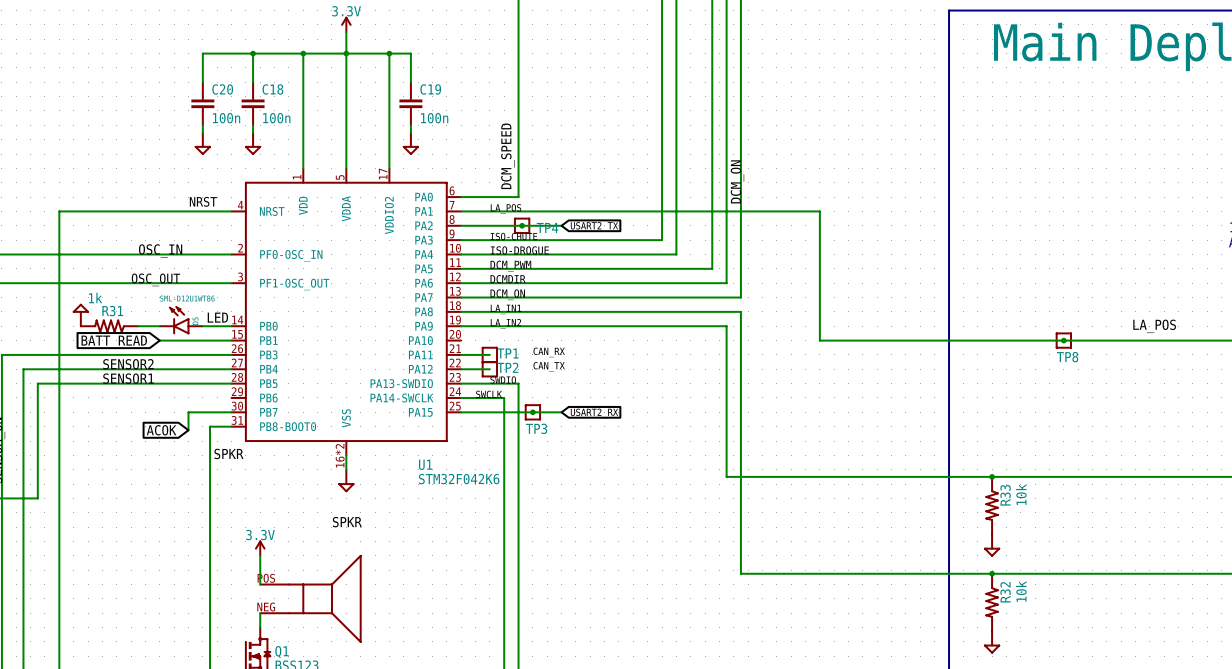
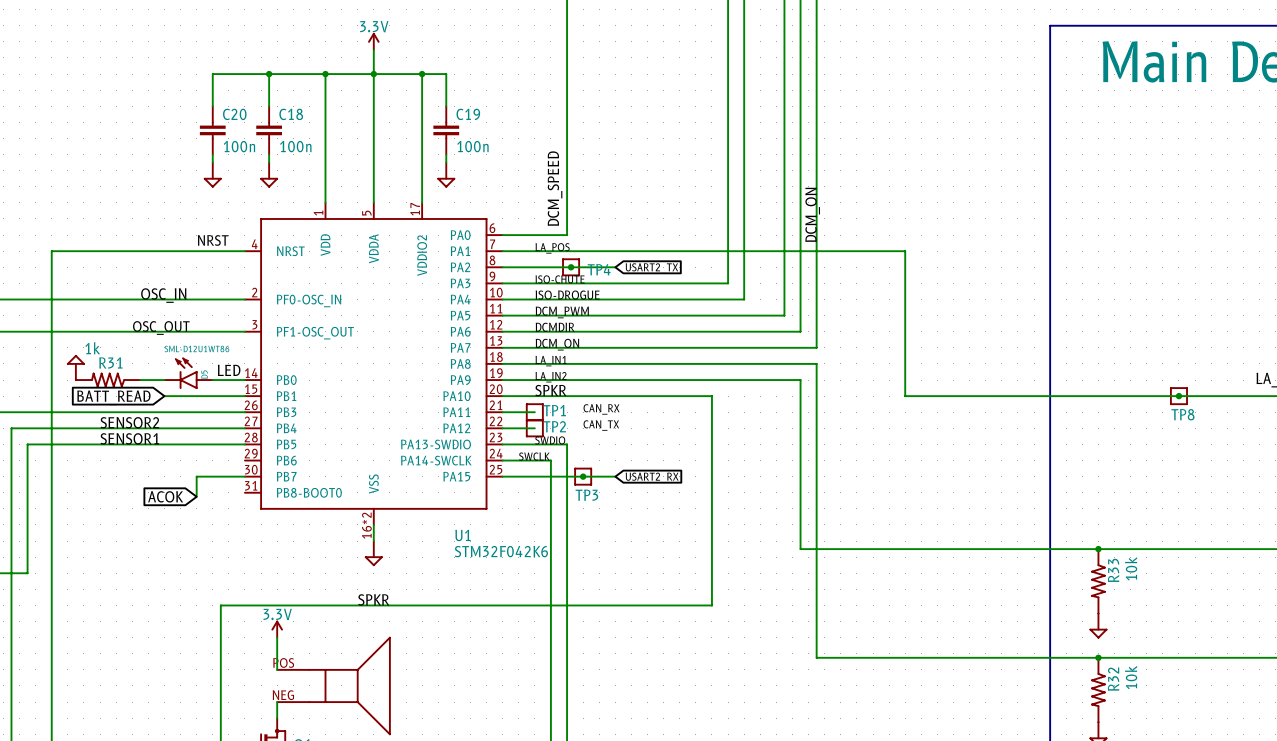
label: none -> SPKR (550, 390)
wire: (231, 426) (210, 426) (210, 527) -> (502, 396) (711, 396) (711, 605) (220, 605)
label: SPKR (228, 453) -> none

